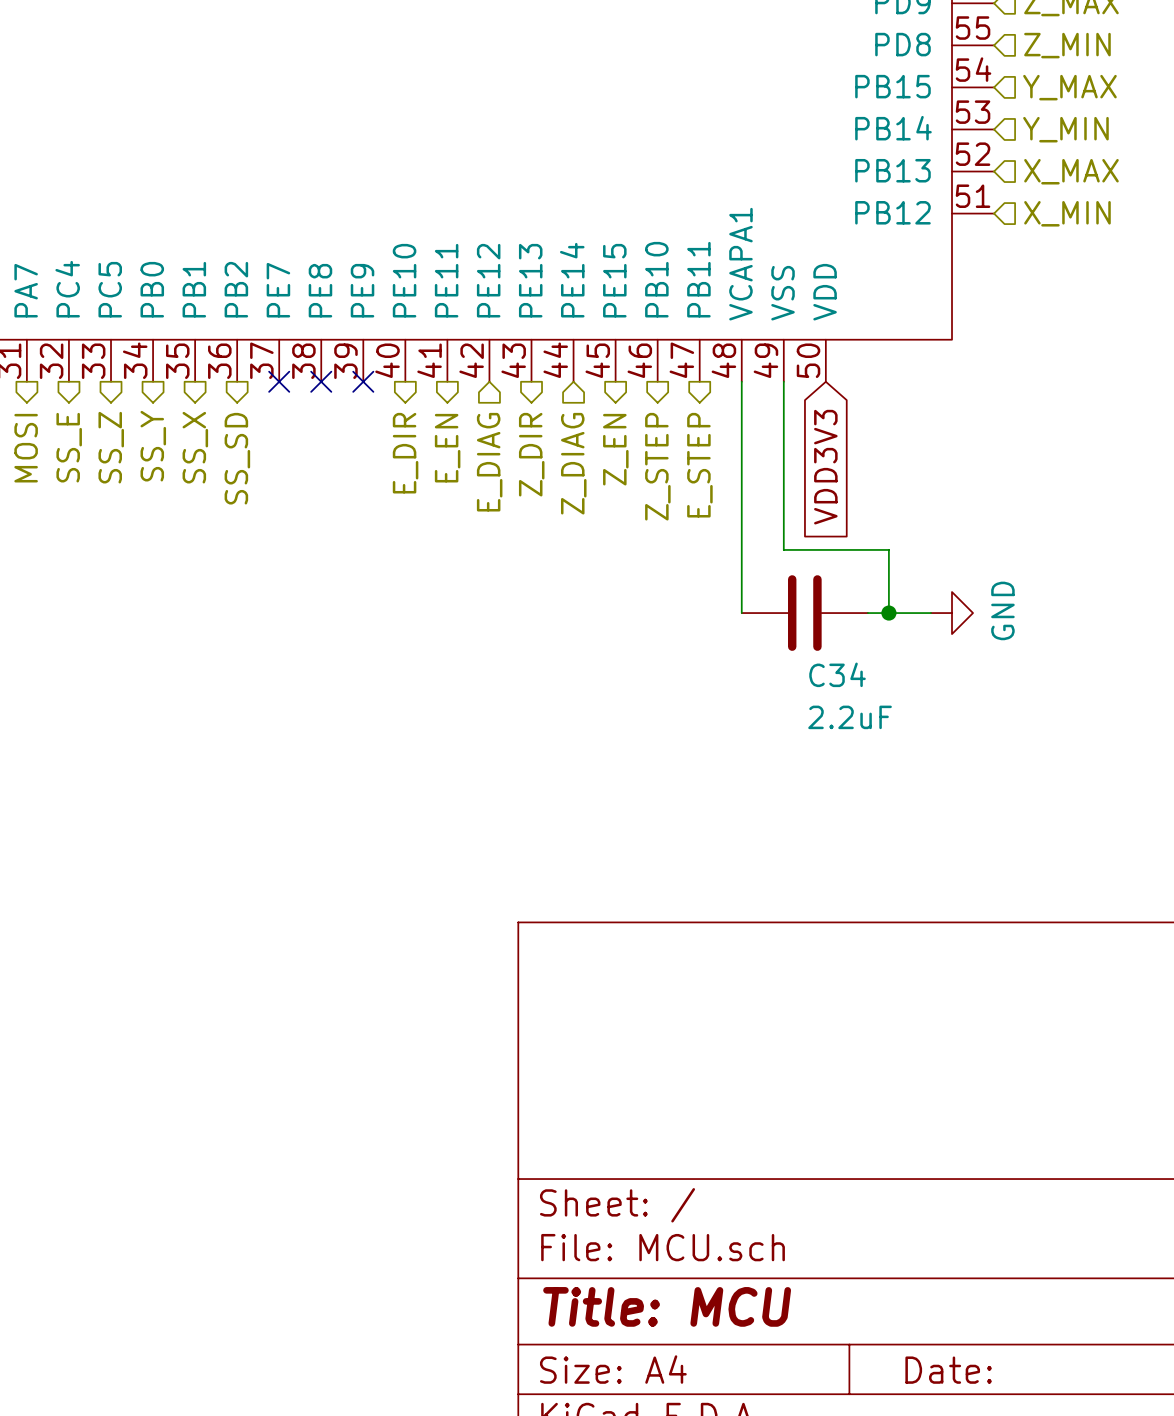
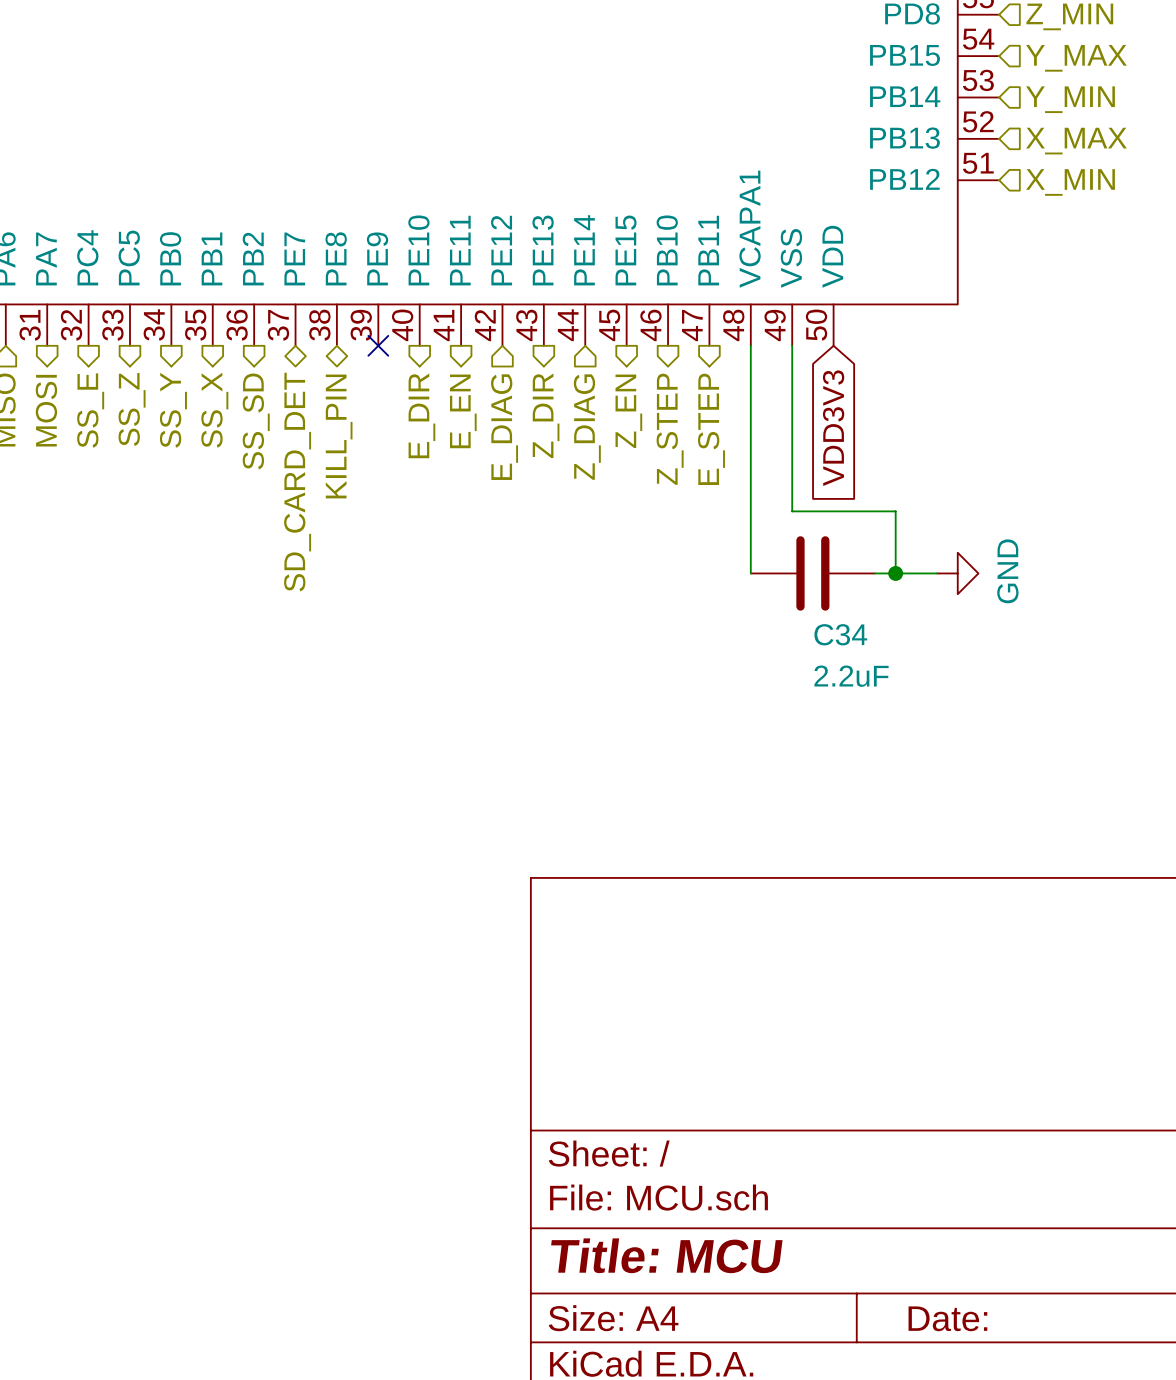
no-connect mark: (279, 381) -> none
no-connect mark: (321, 381) -> none
hierarchical label: none -> KILL_PIN (339, 436)
hierarchical label: none -> SD_CARD_DET (297, 482)

